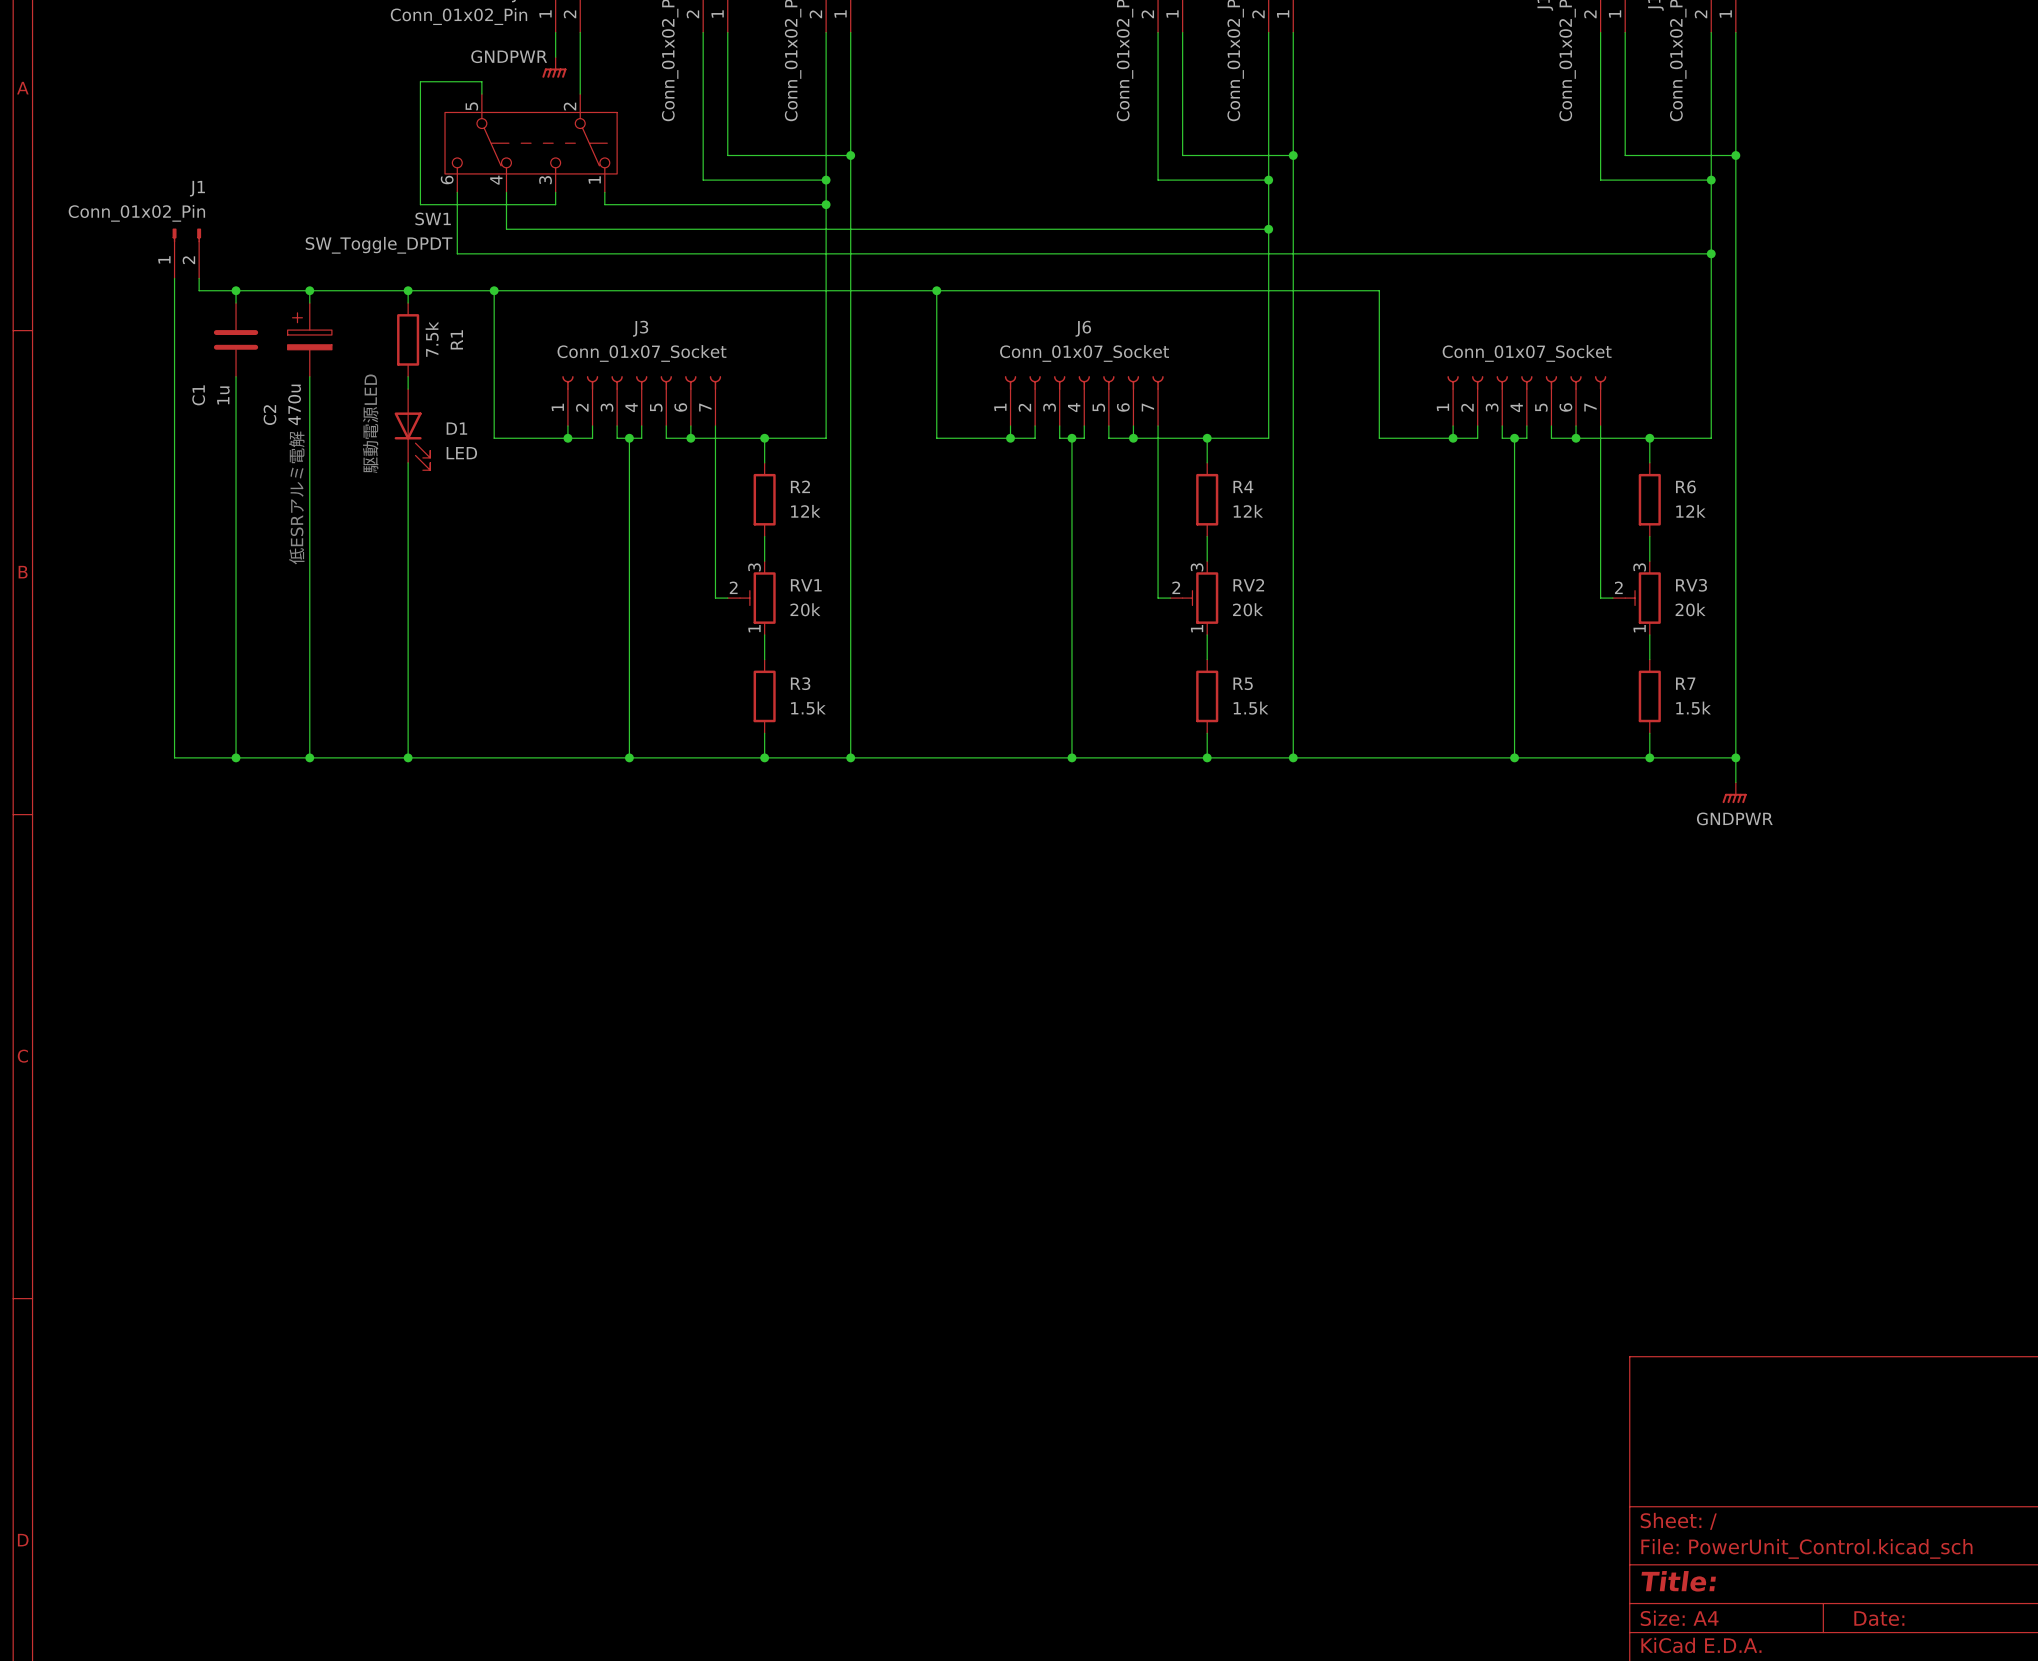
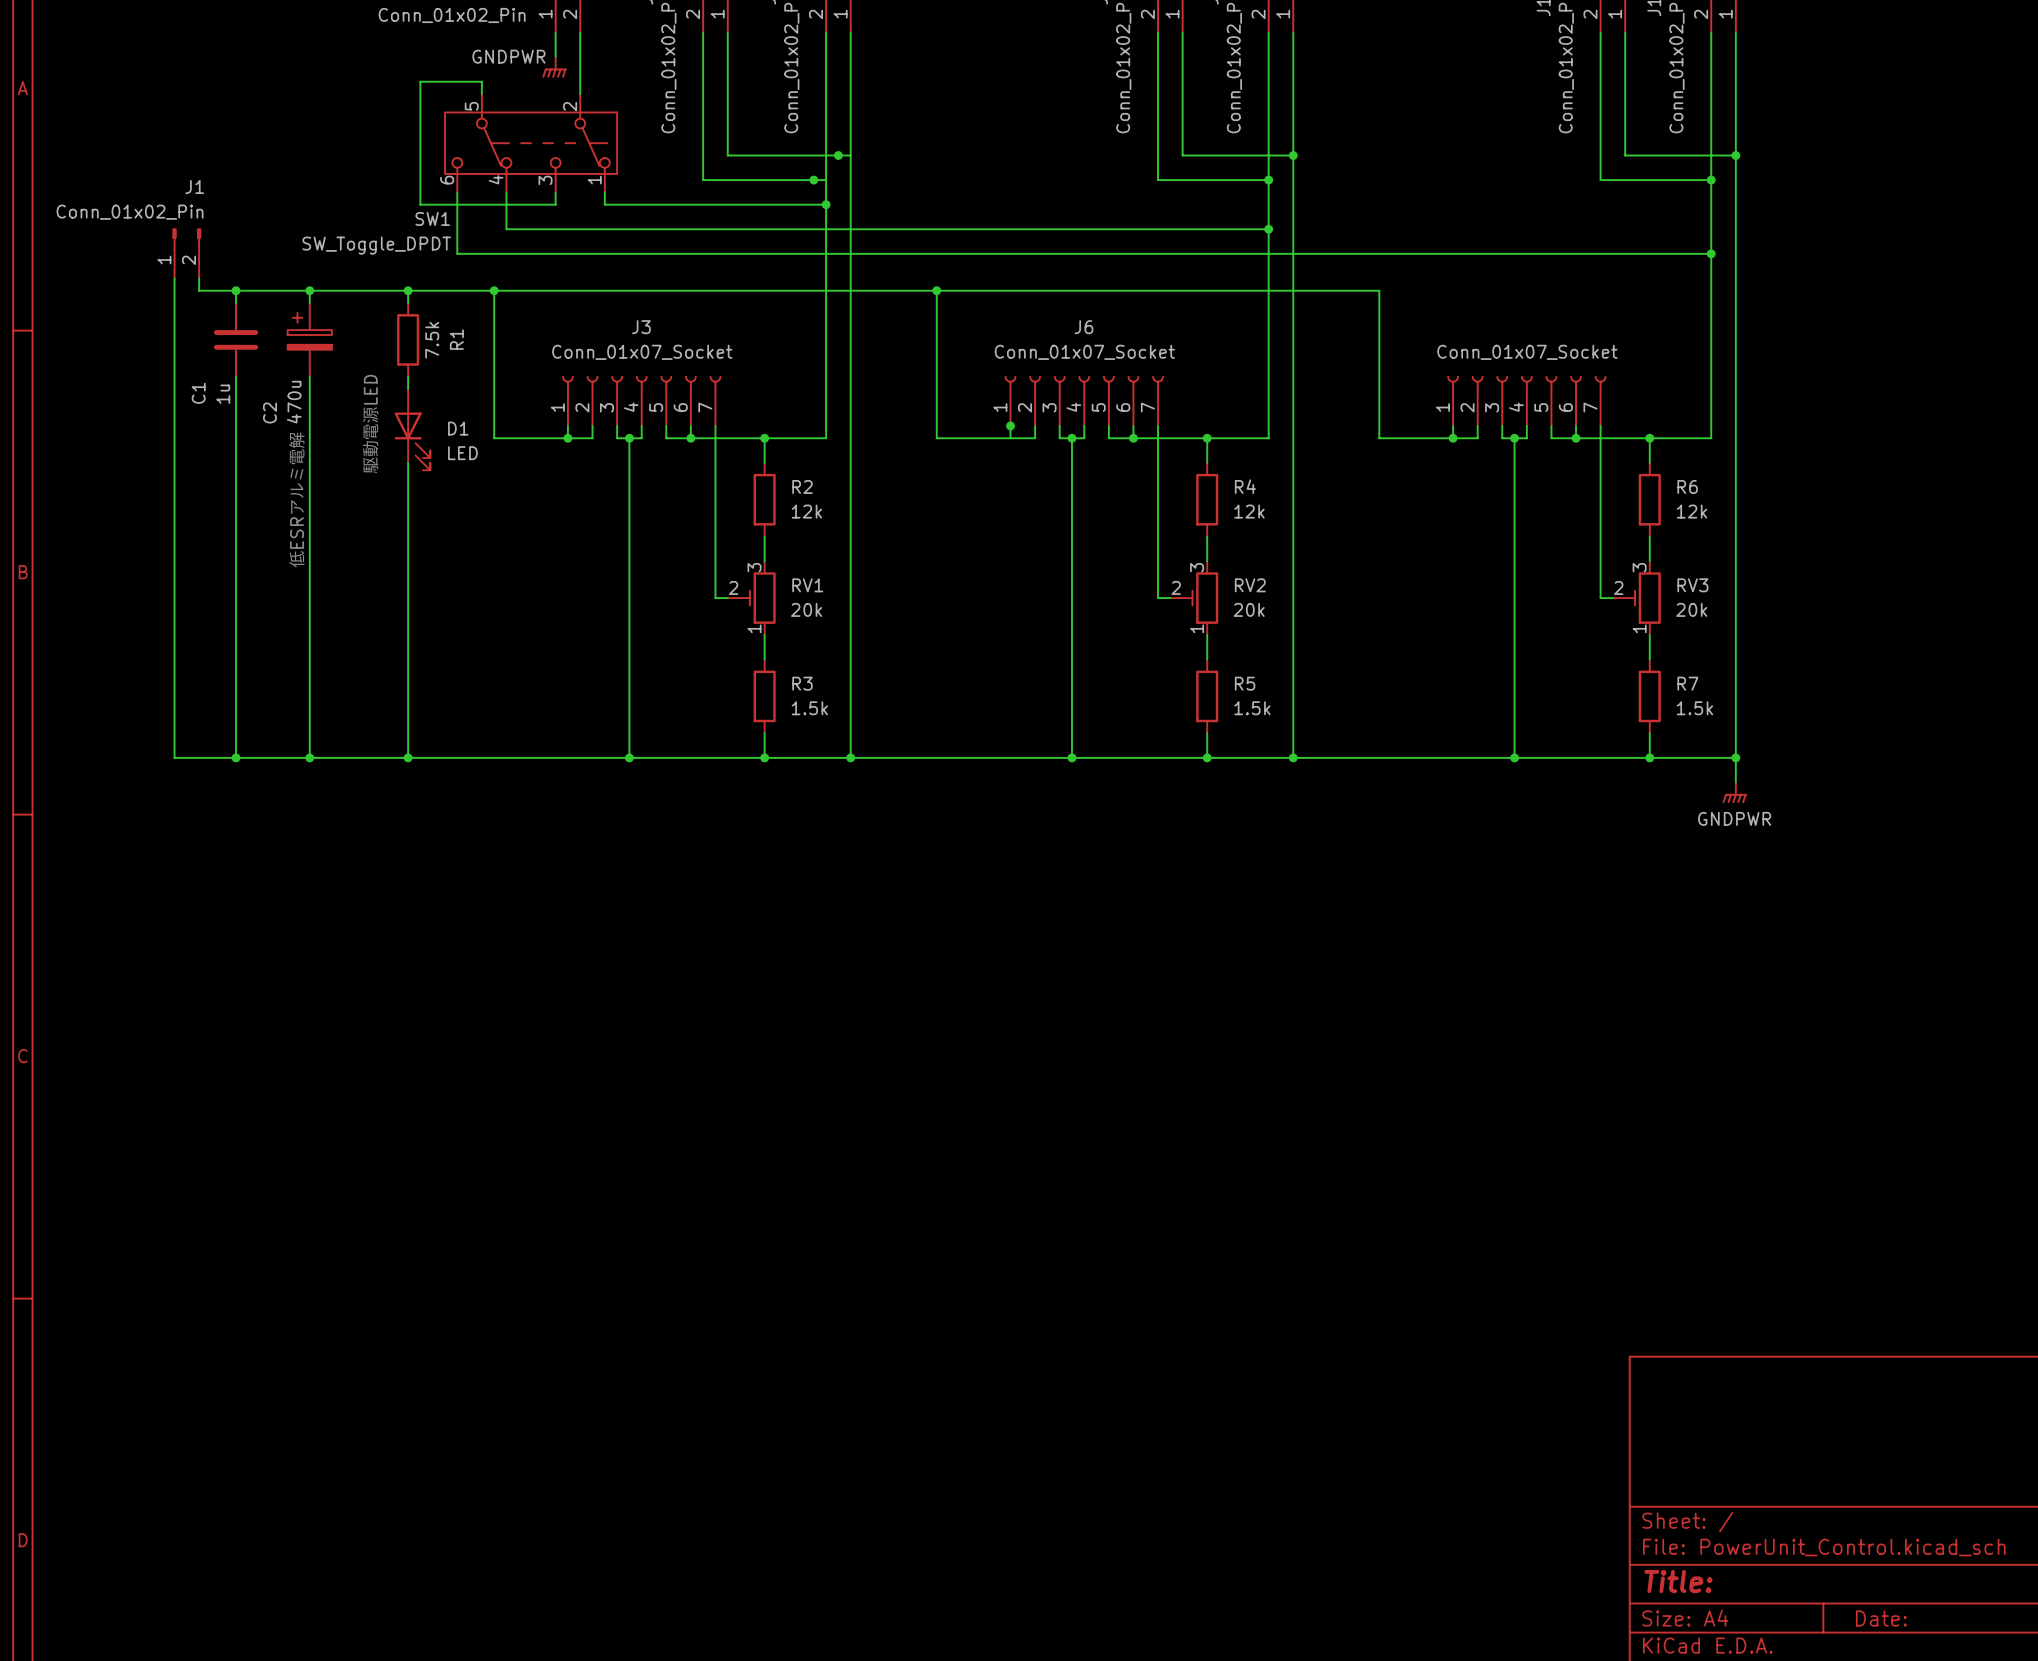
junction position: (850, 155) -> (838, 155)
junction position: (826, 180) -> (813, 180)
junction position: (1010, 438) -> (1010, 425)

